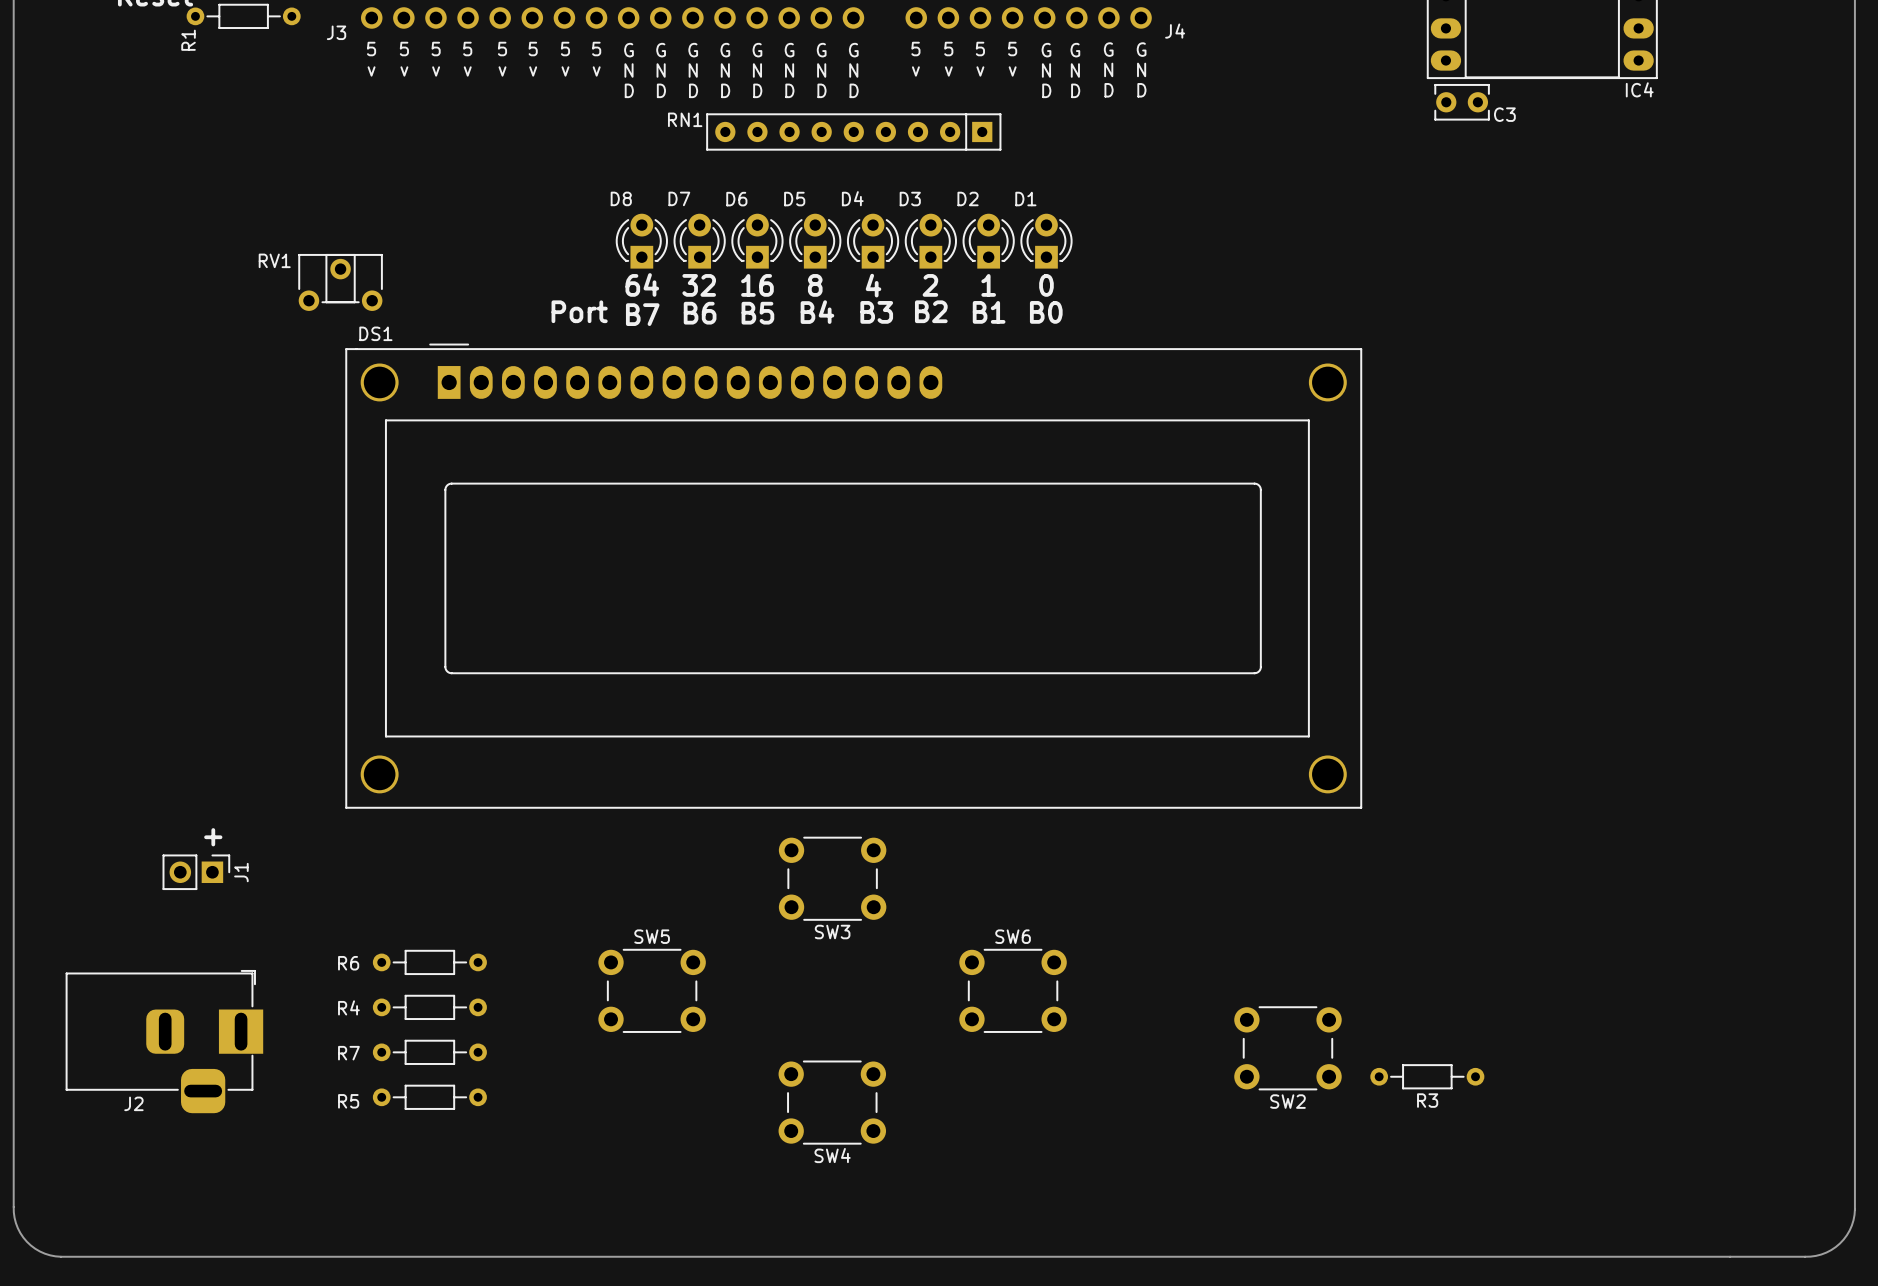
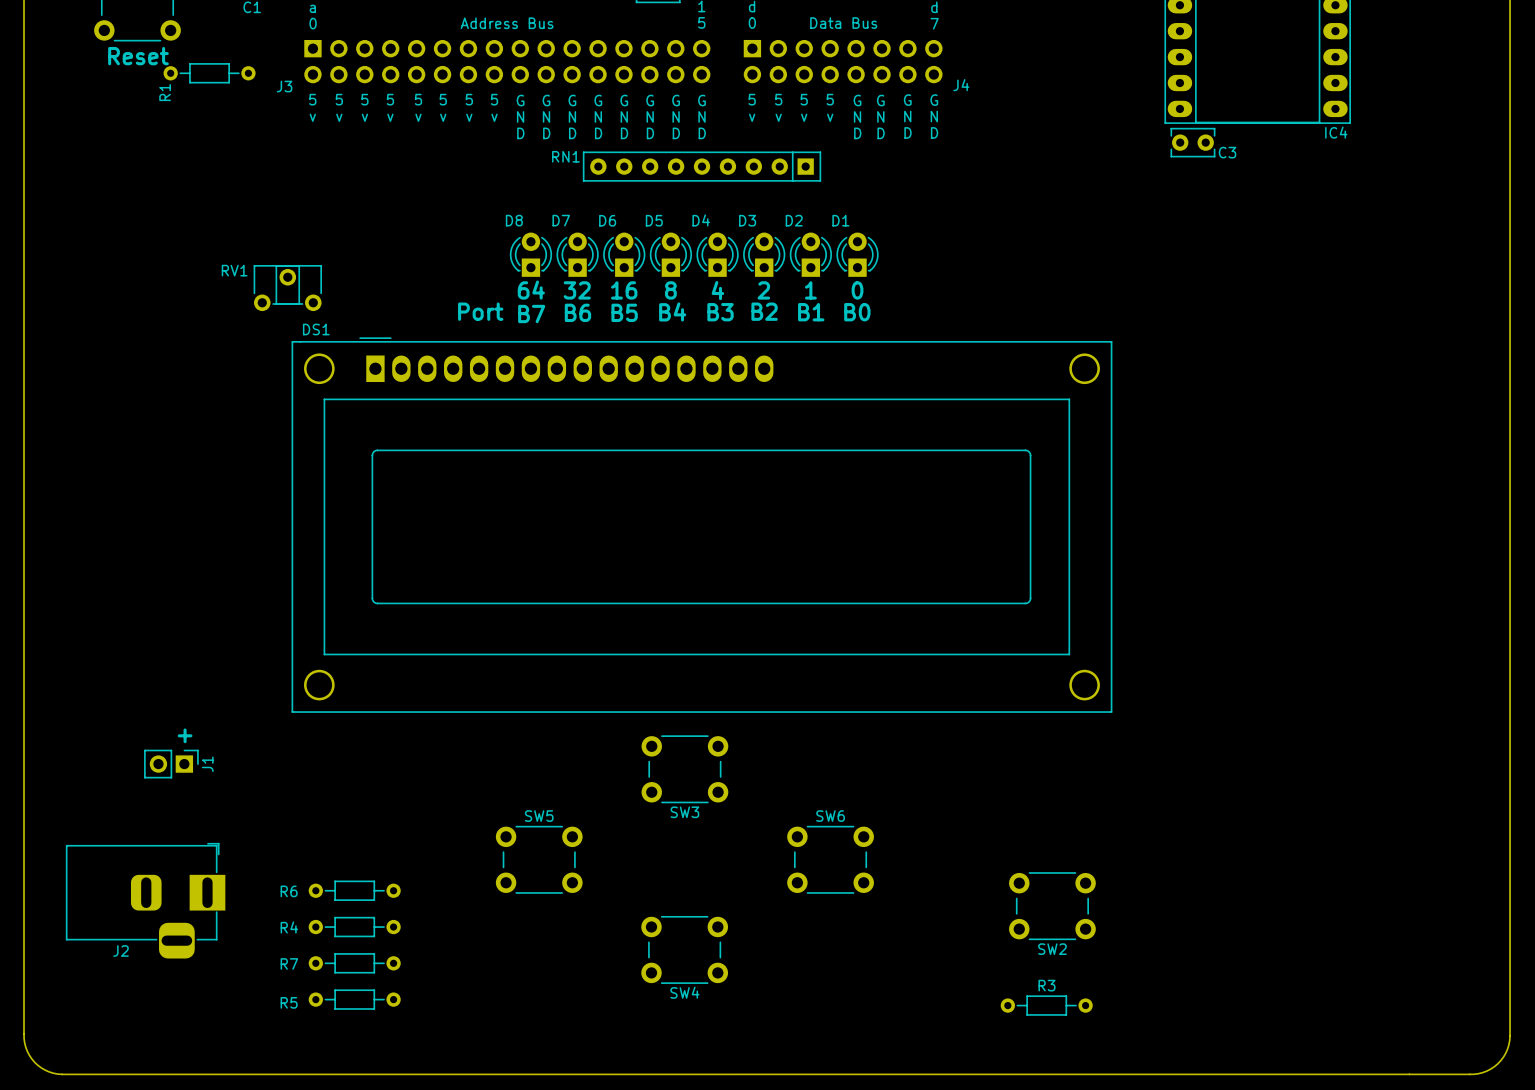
R6 position: (429, 962) -> (354, 890)
R4 position: (429, 1007) -> (354, 927)
R7 position: (429, 1052) -> (354, 963)
R3 position: (1427, 1076) -> (1046, 1005)
R5 position: (429, 1097) -> (354, 999)
R3 name position: R3 (1427, 1100) -> R3 (1046, 985)

